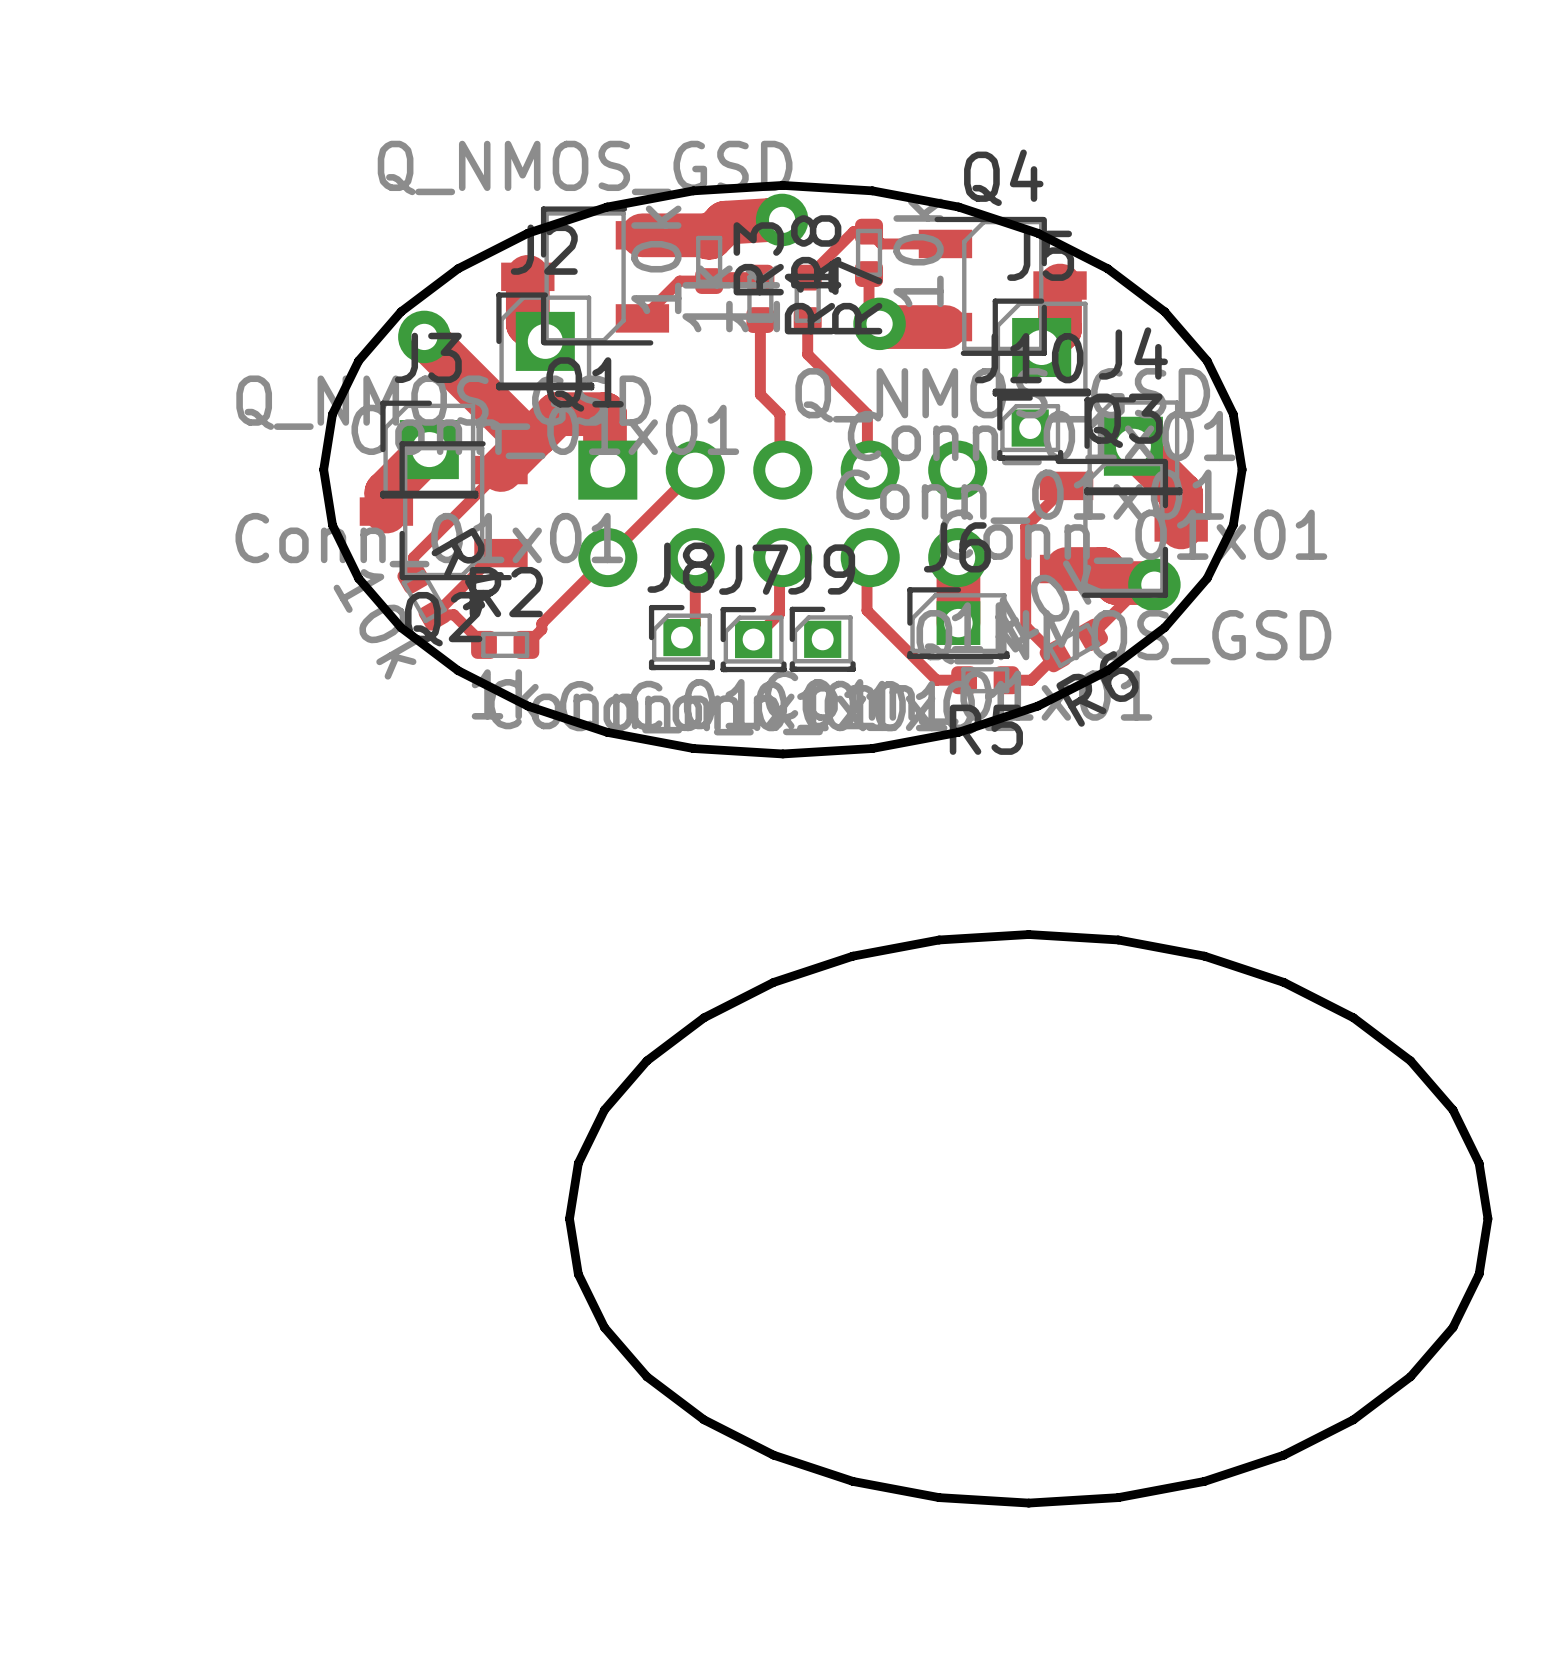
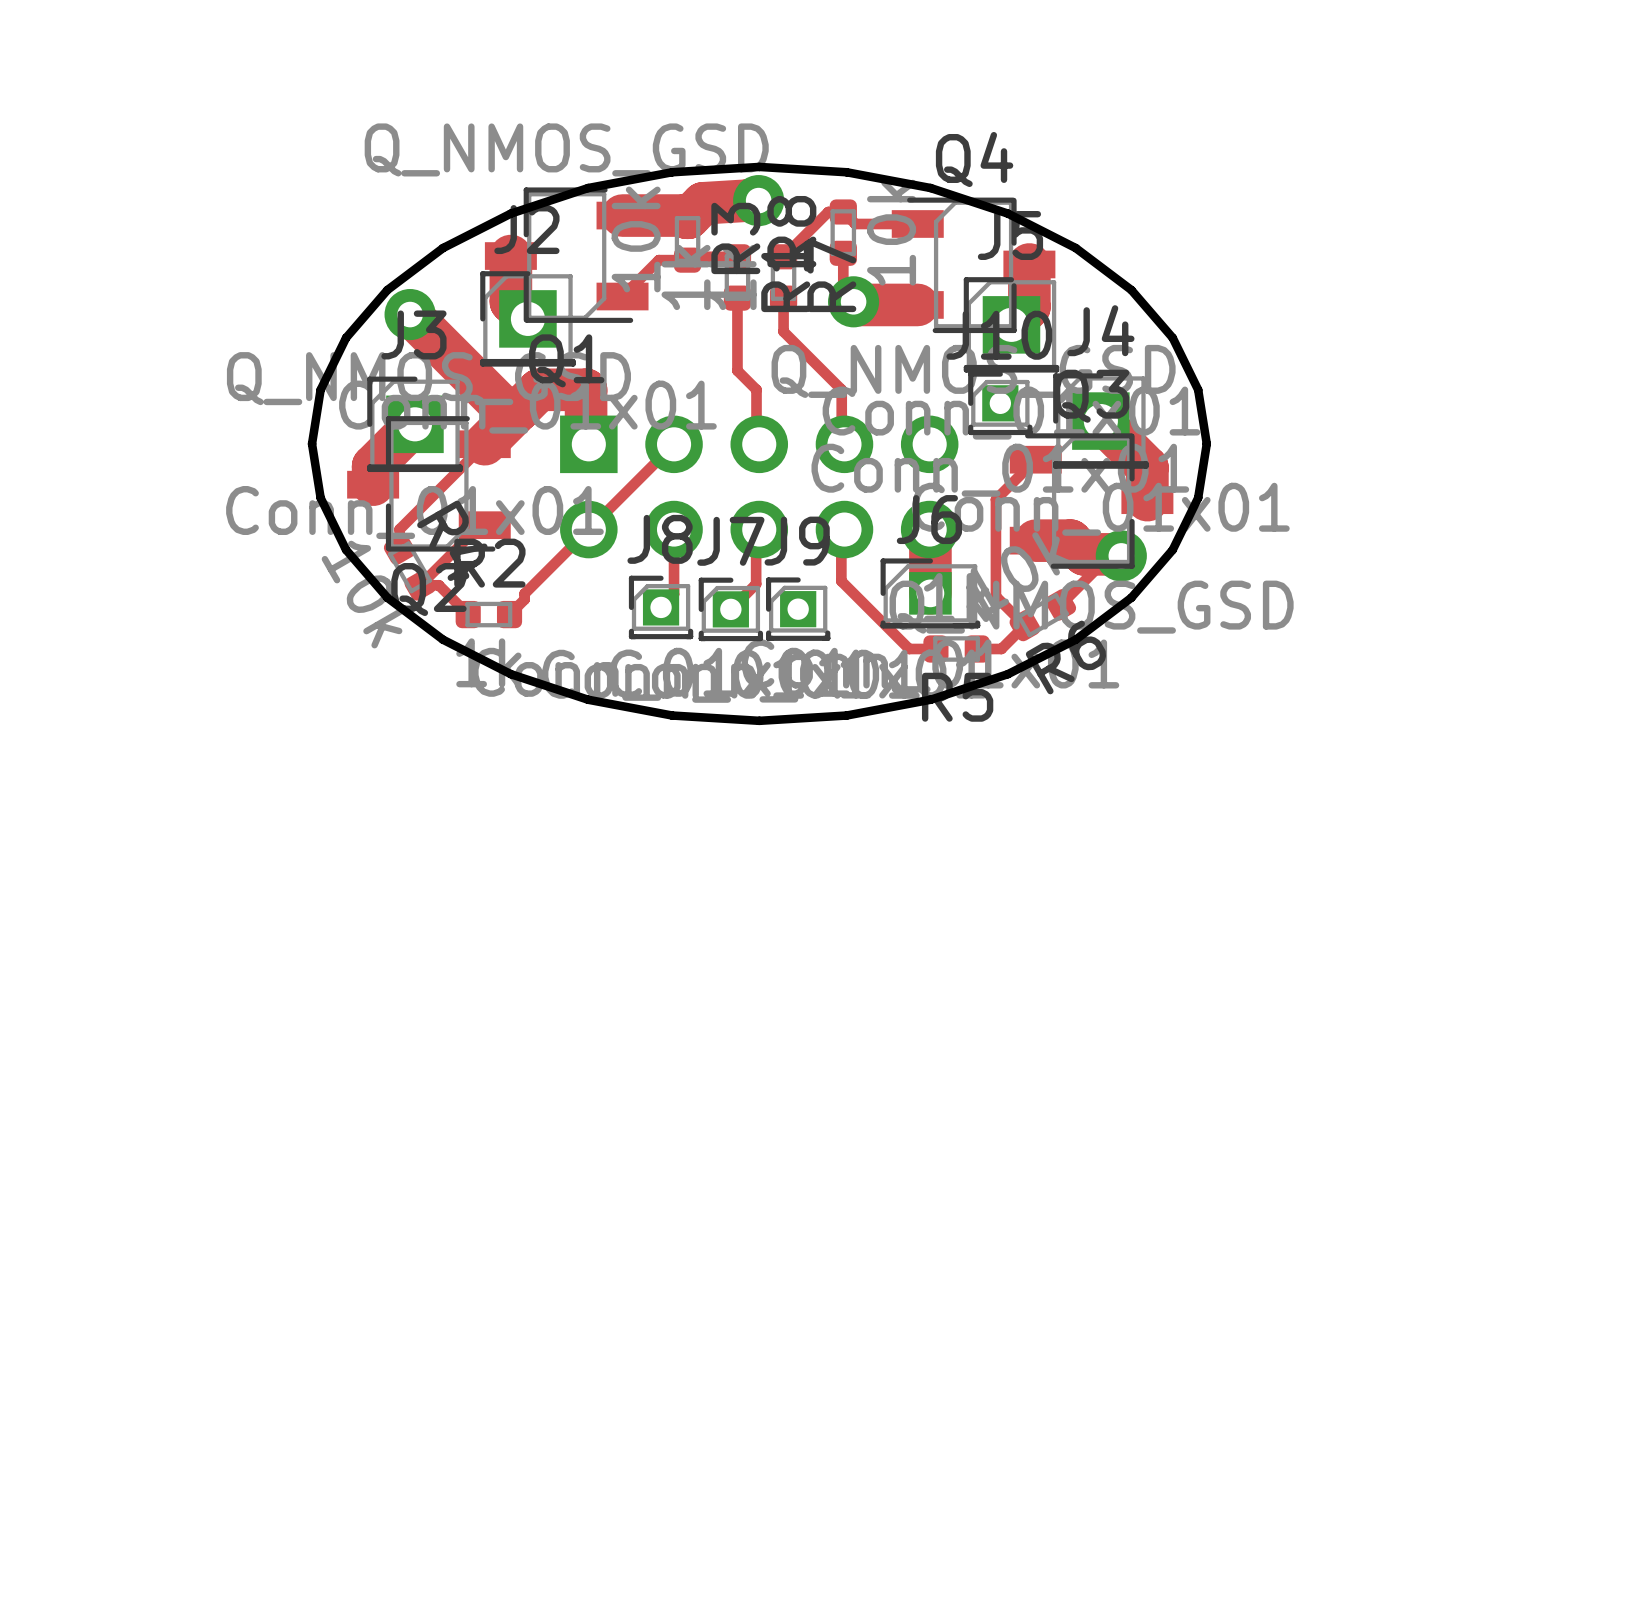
board edge: (1028, 934) (939, 939) (853, 956) (773, 982) (704, 1017) (646, 1060) (604, 1110) (578, 1163) (569, 1218) (578, 1274) (604, 1327) (646, 1376) (704, 1419) (773, 1455) (853, 1481) (939, 1497) (1028, 1503) (1118, 1497) (1204, 1481) (1283, 1455) (1353, 1419) (1410, 1376) (1453, 1327) (1479, 1274) (1487, 1218) (1479, 1163) (1453, 1110) (1410, 1060) (1353, 1017) (1283, 982) (1204, 956) (1118, 939) (1028, 934) -> none

